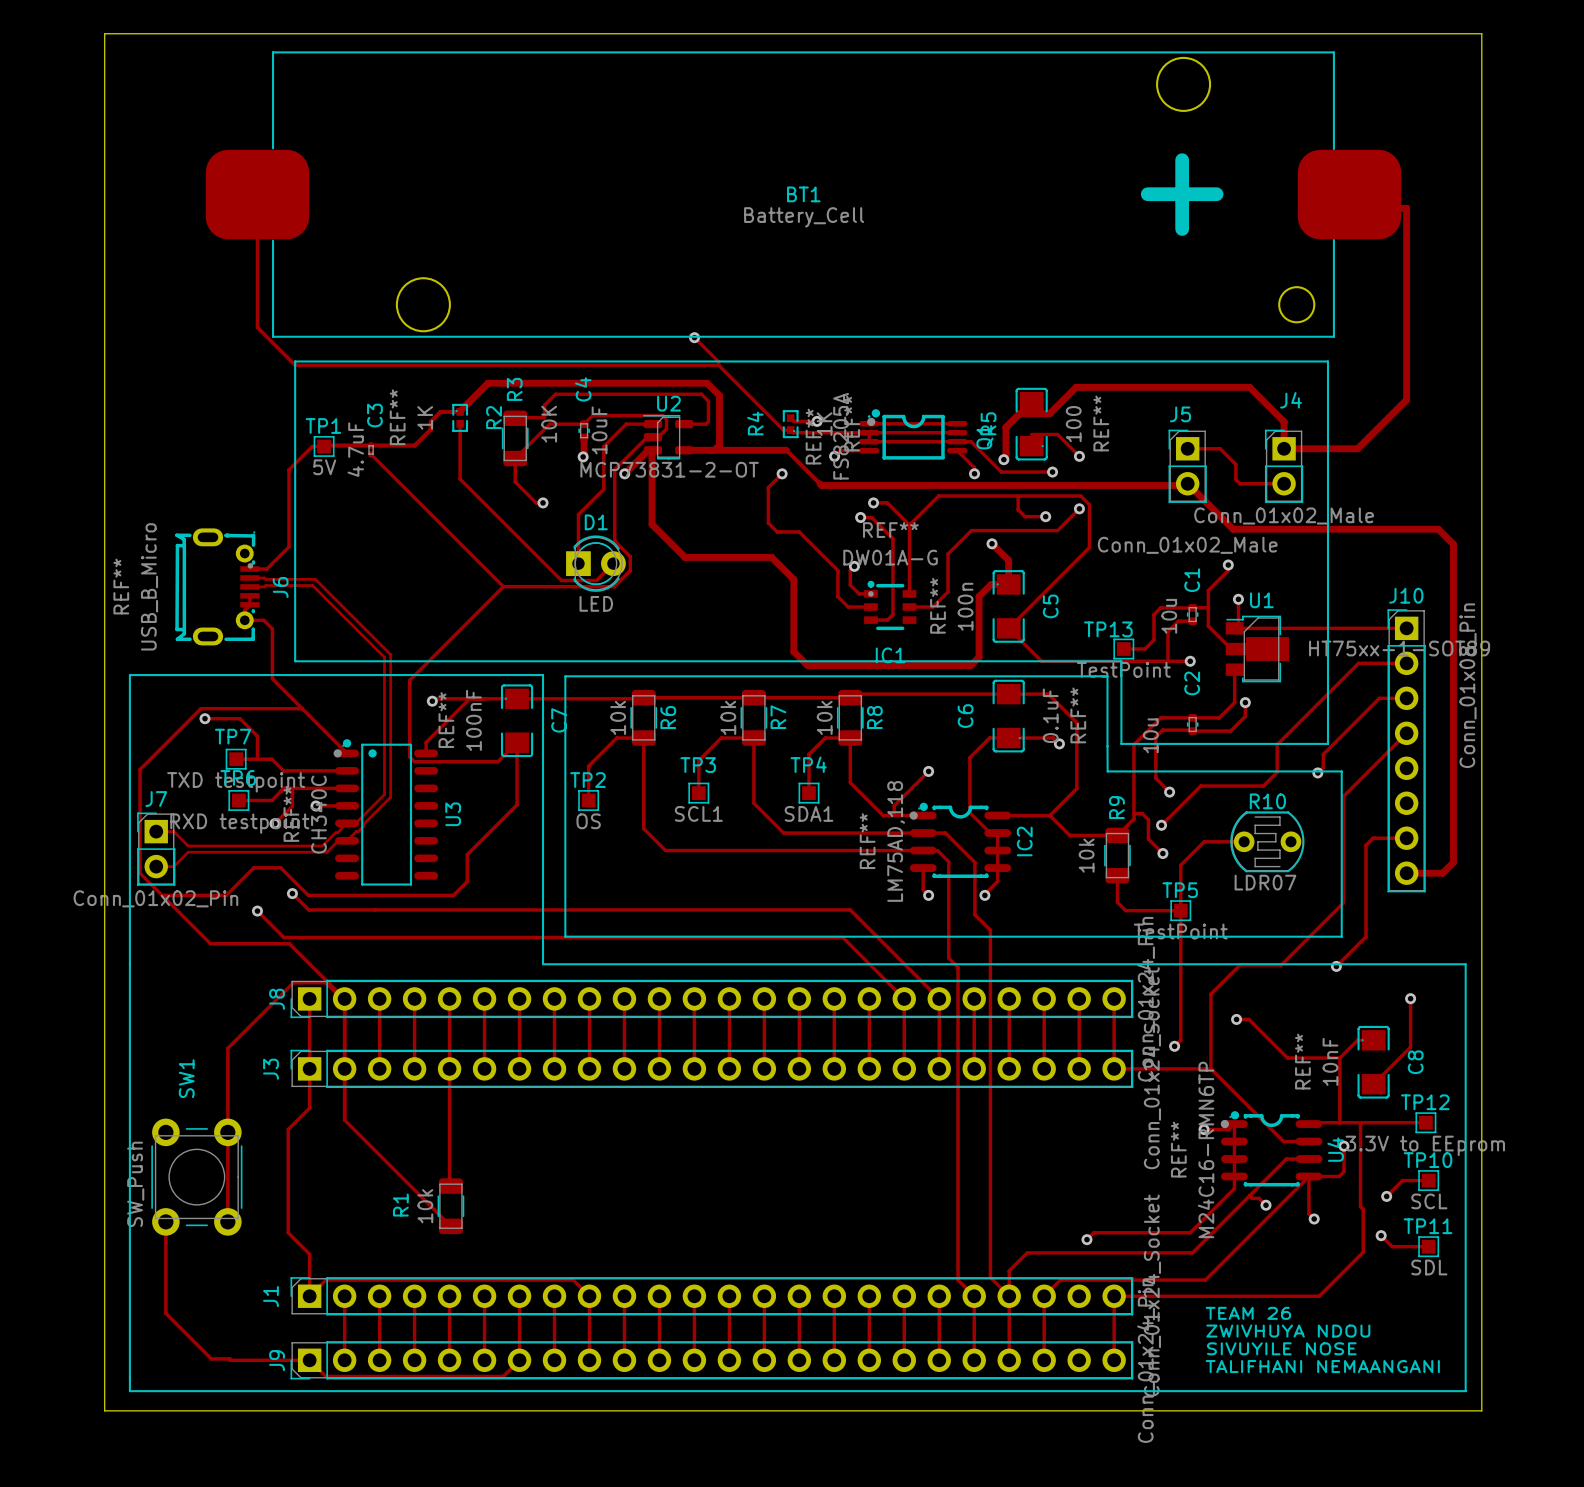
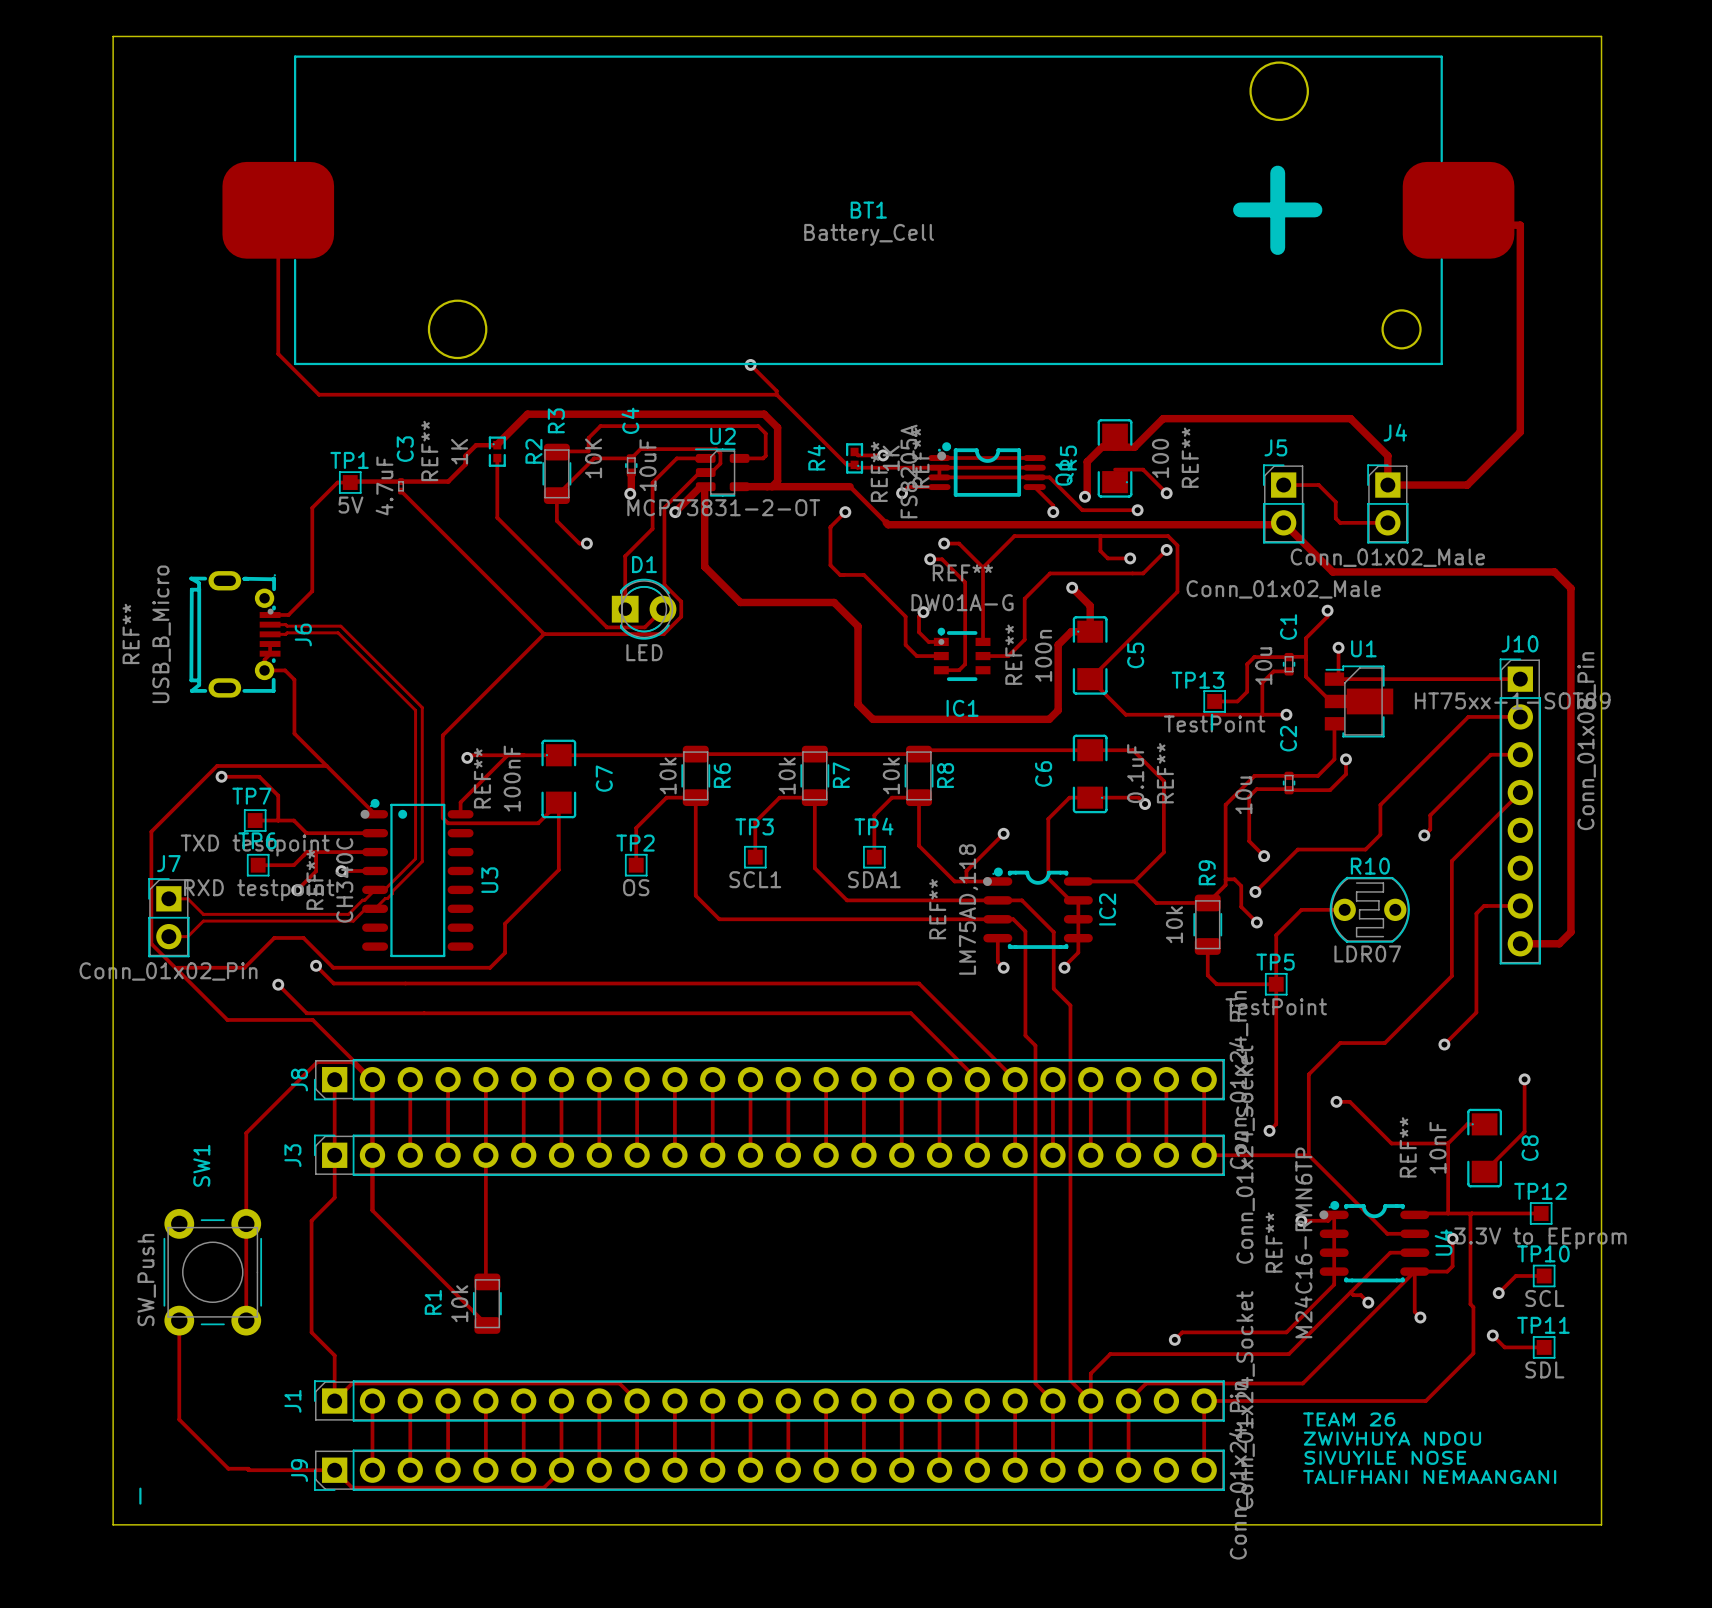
line: (1121, 661) (295, 661) (295, 361) (1327, 361) (1327, 743) (1121, 743) (1121, 675) -> none
line: (565, 676) (1107, 676) (1107, 771) (1341, 771) (1341, 936) (565, 936) (565, 676) -> none
line: (129, 1377) (129, 675) (543, 675) (543, 964) (1465, 964) (1465, 1391) (129, 1391) -> none

